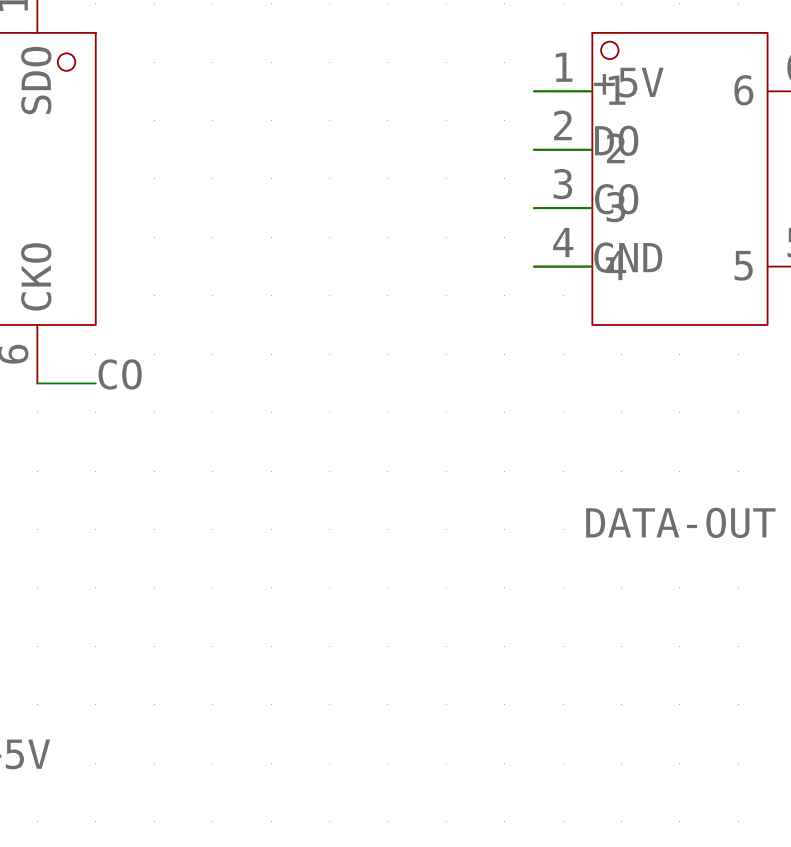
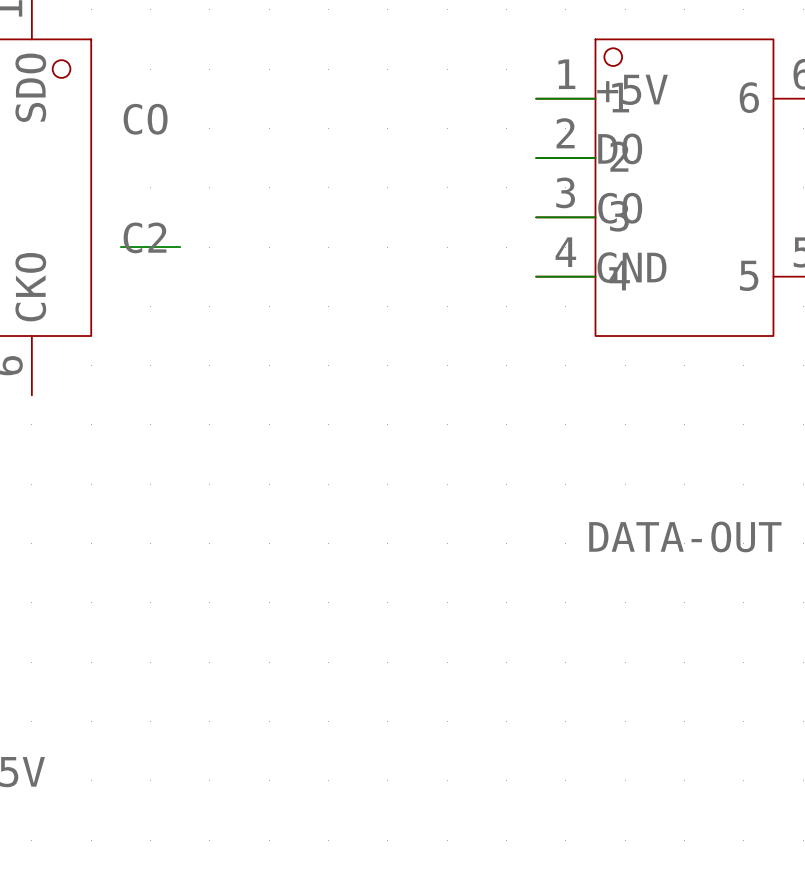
label: none -> C2 (145, 237)
label position: CO (120, 374) -> CO (145, 119)
wire: (37, 383) (95, 383) -> (120, 247) (180, 247)

